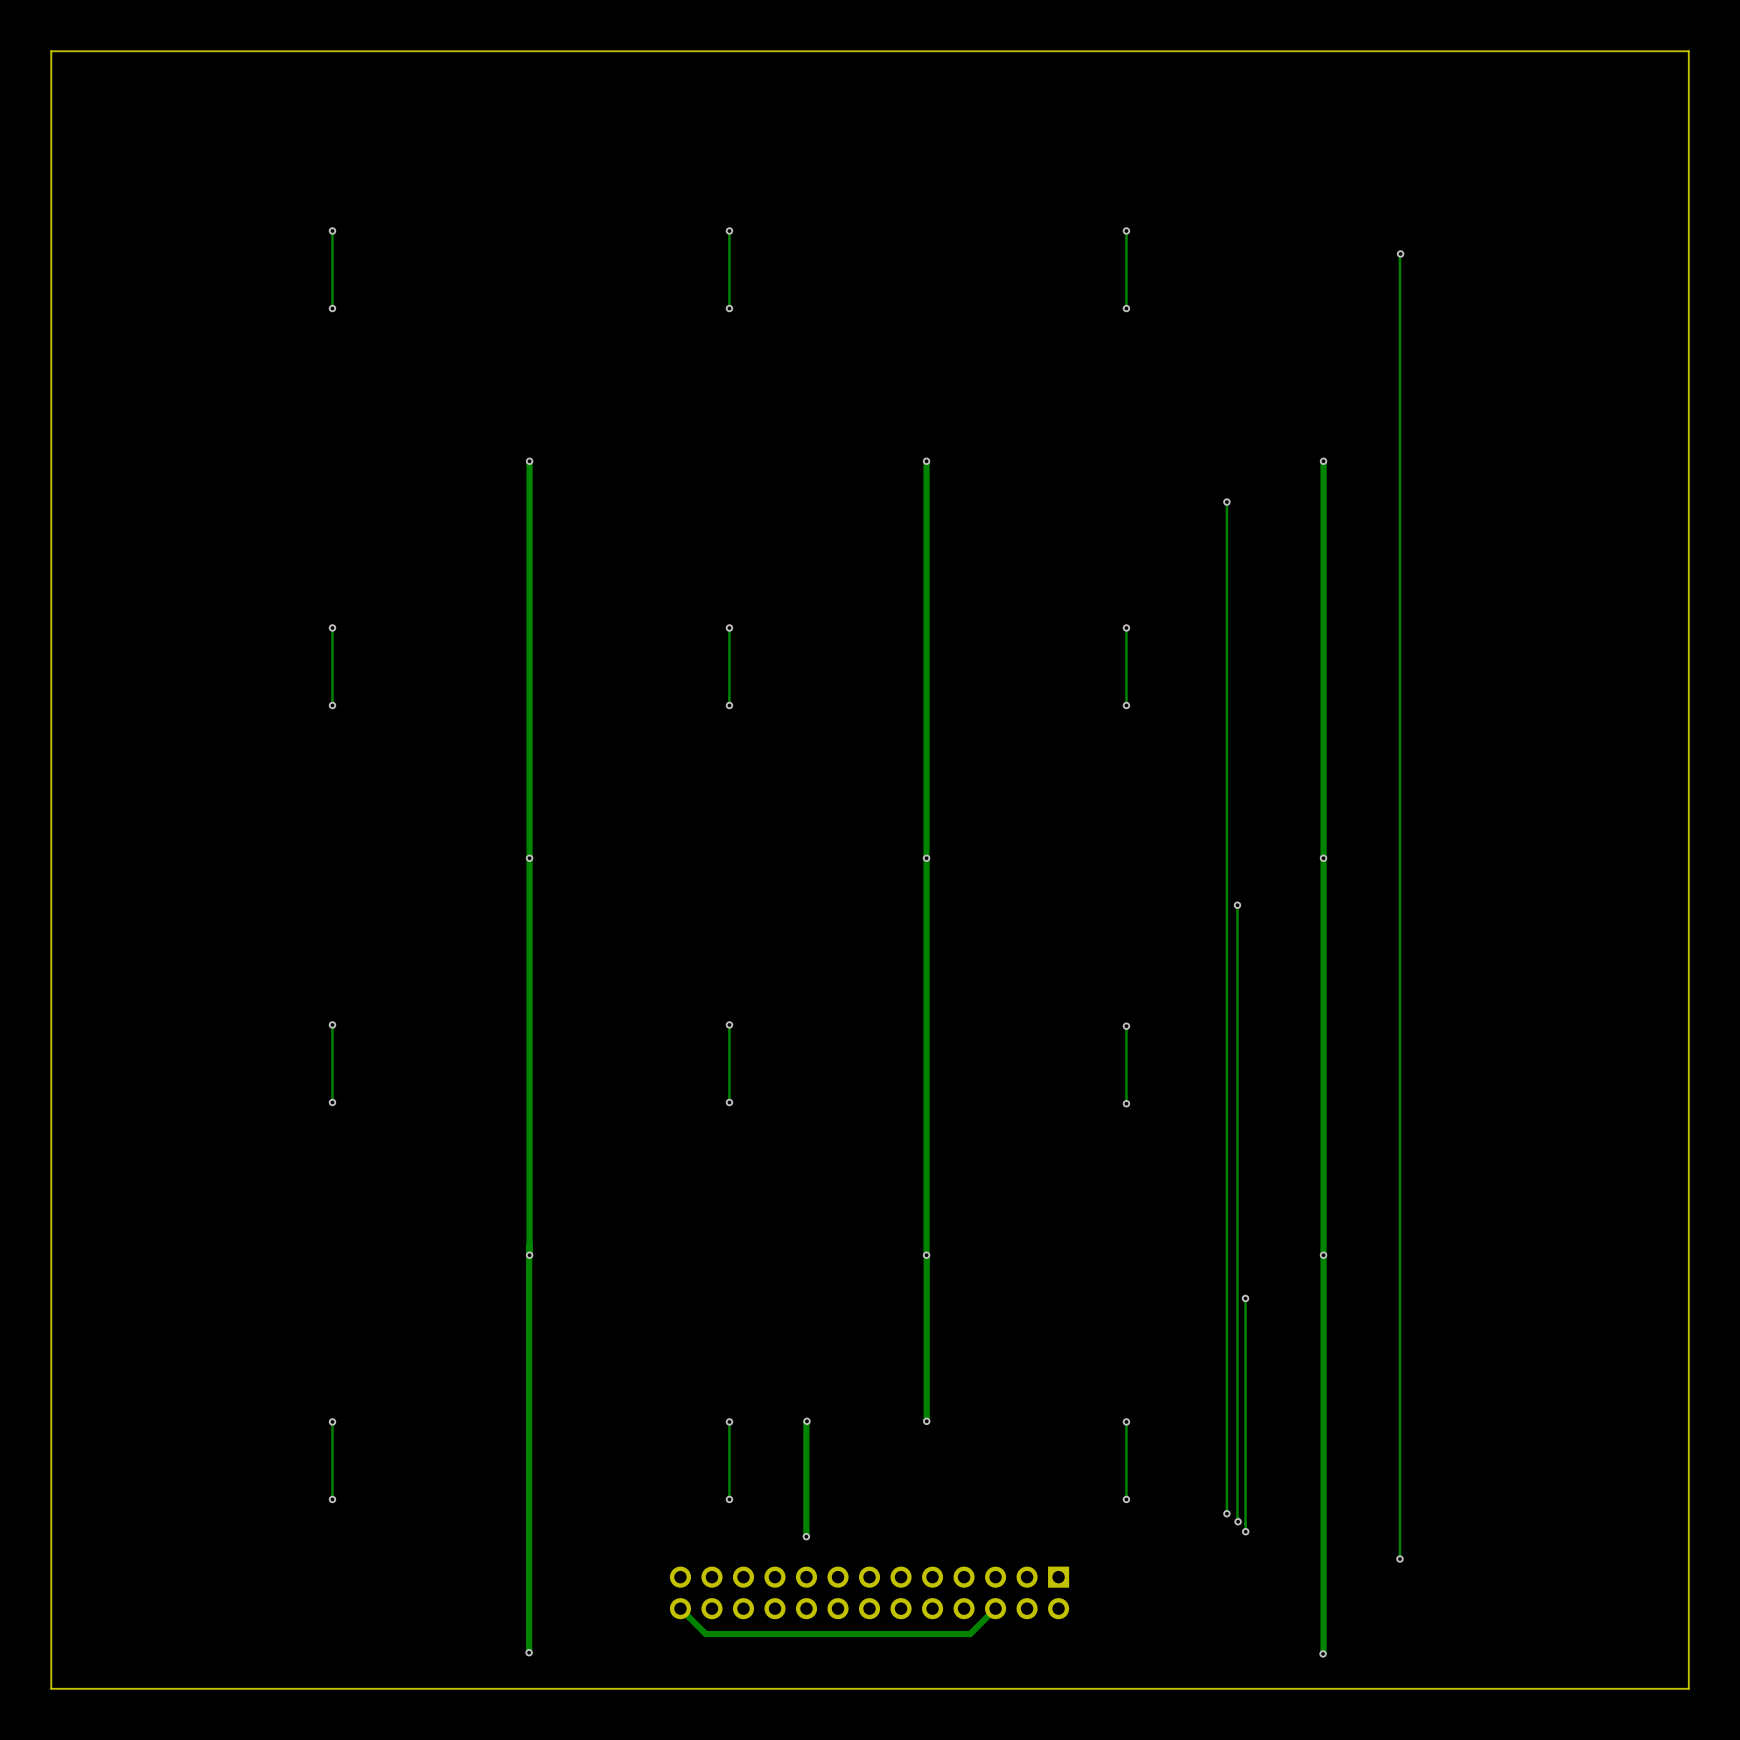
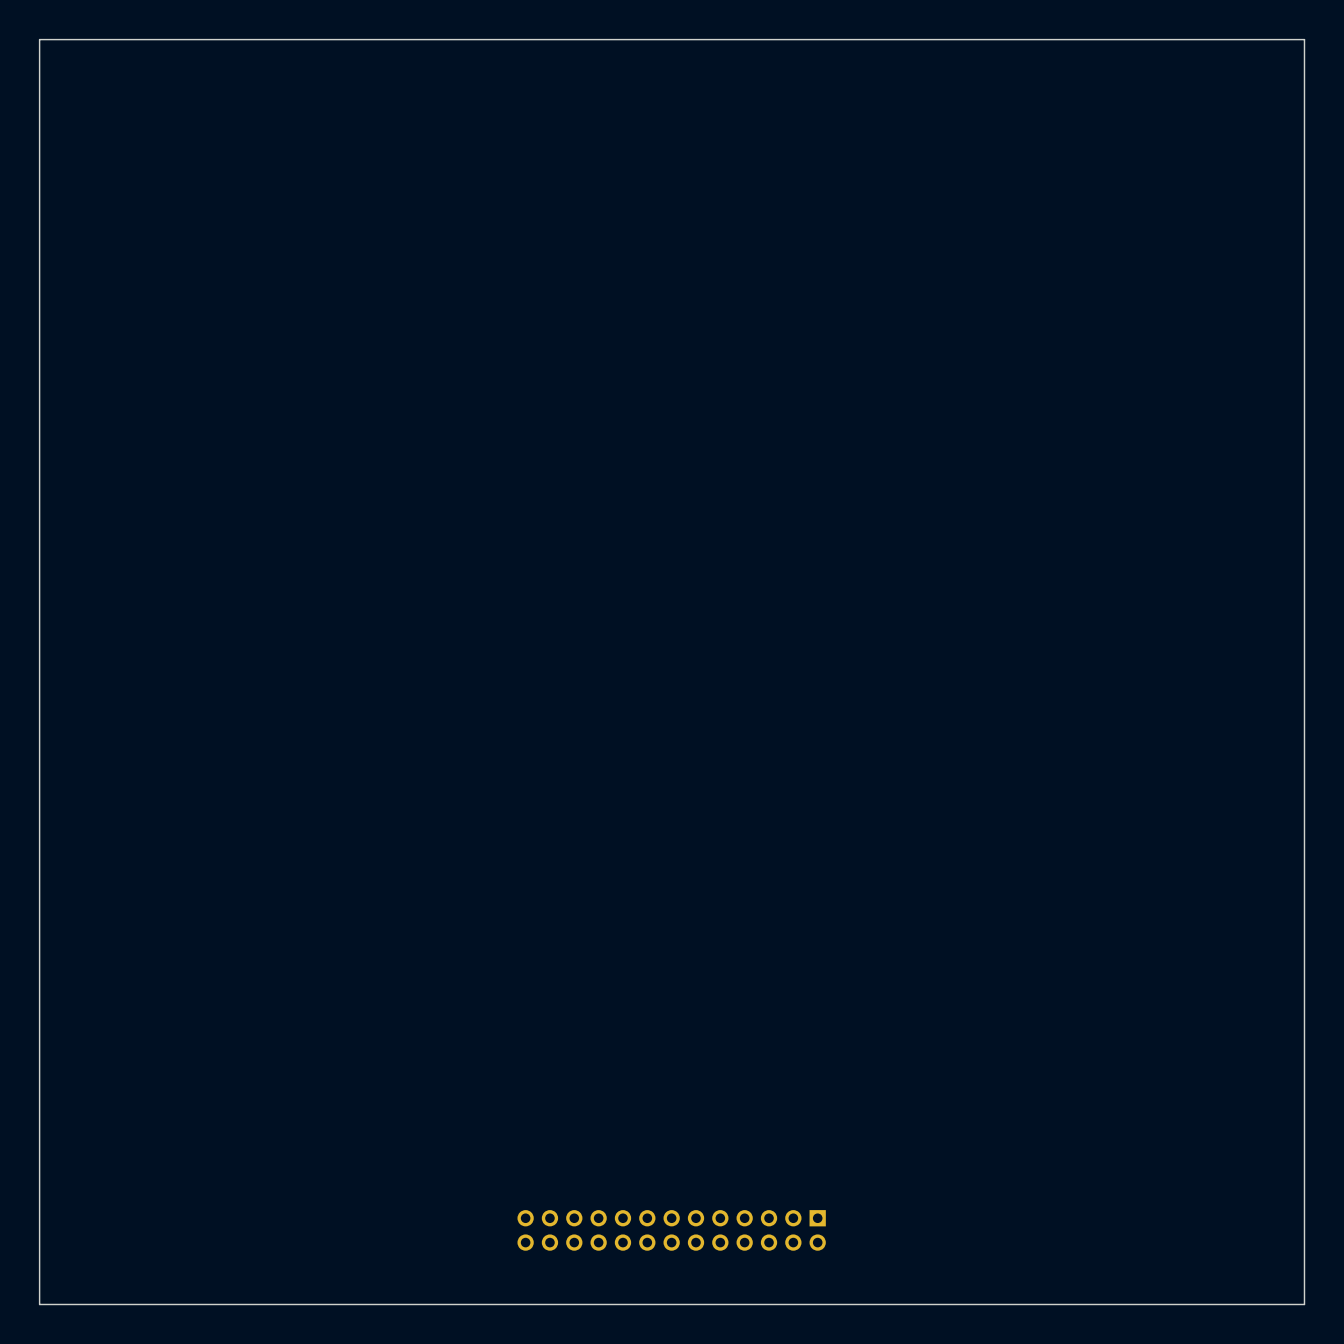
track: (332, 230) (332, 308) -> none
via: (332, 230) -> none
track: (729, 230) (729, 308) -> none
via: (729, 230) -> none
track: (1126, 230) (1126, 308) -> none
via: (1126, 230) -> none
track: (1400, 253) (1399, 1559) -> none
via: (1400, 253) -> none
via: (332, 308) -> none
via: (729, 308) -> none
via: (1126, 308) -> none
track: (529, 461) (529, 1255) -> none
via: (529, 461) -> none
track: (926, 461) (926, 1255) -> none
via: (926, 461) -> none
track: (1323, 461) (1323, 1653) -> none
via: (1323, 461) -> none
track: (1226, 502) (1226, 1513) -> none
via: (1226, 502) -> none
track: (332, 627) (332, 705) -> none
via: (332, 627) -> none
track: (729, 627) (729, 705) -> none
via: (729, 627) -> none
track: (1126, 627) (1126, 705) -> none
via: (1126, 627) -> none
via: (332, 705) -> none
via: (729, 705) -> none
via: (1126, 705) -> none
via: (529, 858) -> none
via: (926, 858) -> none
via: (1323, 858) -> none
track: (1237, 905) (1238, 1521) -> none
via: (1237, 905) -> none
track: (332, 1024) (332, 1102) -> none
via: (332, 1024) -> none
track: (729, 1024) (729, 1102) -> none
via: (729, 1024) -> none
track: (1126, 1026) (1126, 1103) -> none
via: (1126, 1026) -> none
via: (332, 1102) -> none
via: (729, 1102) -> none
via: (1126, 1103) -> none
track: (529, 1245) (529, 1652) -> none
via: (529, 1255) -> none
track: (926, 1255) (926, 1421) -> none
via: (926, 1255) -> none
via: (1323, 1255) -> none
track: (1245, 1298) (1245, 1531) -> none
via: (1245, 1298) -> none
track: (332, 1421) (332, 1499) -> none
via: (332, 1421) -> none
track: (729, 1421) (729, 1499) -> none
via: (729, 1421) -> none
track: (806, 1421) (806, 1536) -> none
via: (806, 1421) -> none
via: (926, 1421) -> none
track: (1126, 1421) (1126, 1499) -> none
via: (1126, 1421) -> none
via: (332, 1499) -> none
via: (729, 1499) -> none
via: (1126, 1499) -> none
via: (1226, 1513) -> none
via: (1238, 1521) -> none
via: (1245, 1531) -> none
via: (806, 1536) -> none
via: (1399, 1559) -> none
track: (995, 1608) (970, 1634) (705, 1634) (680, 1608) -> none
via: (529, 1652) -> none
via: (1323, 1653) -> none

